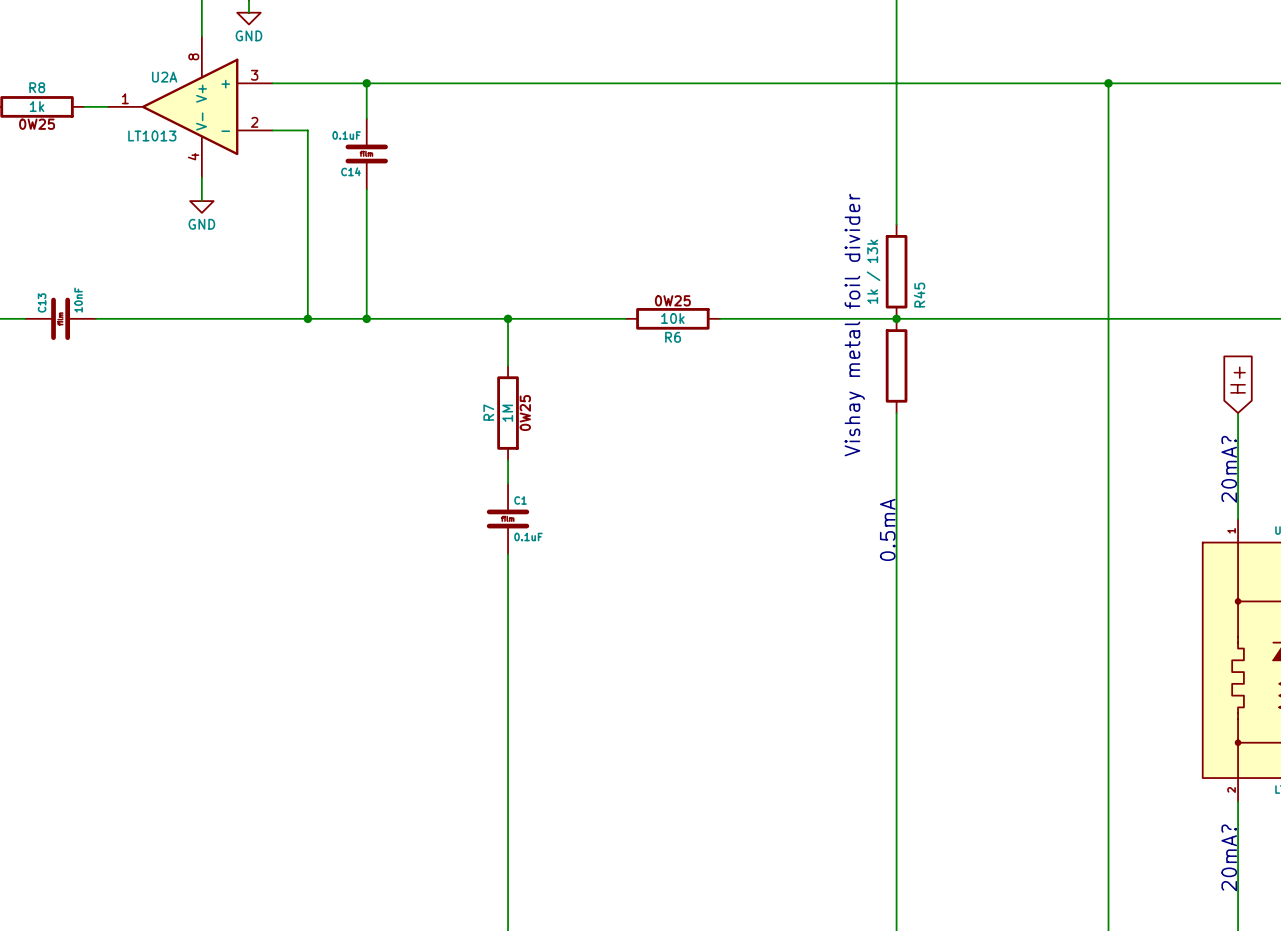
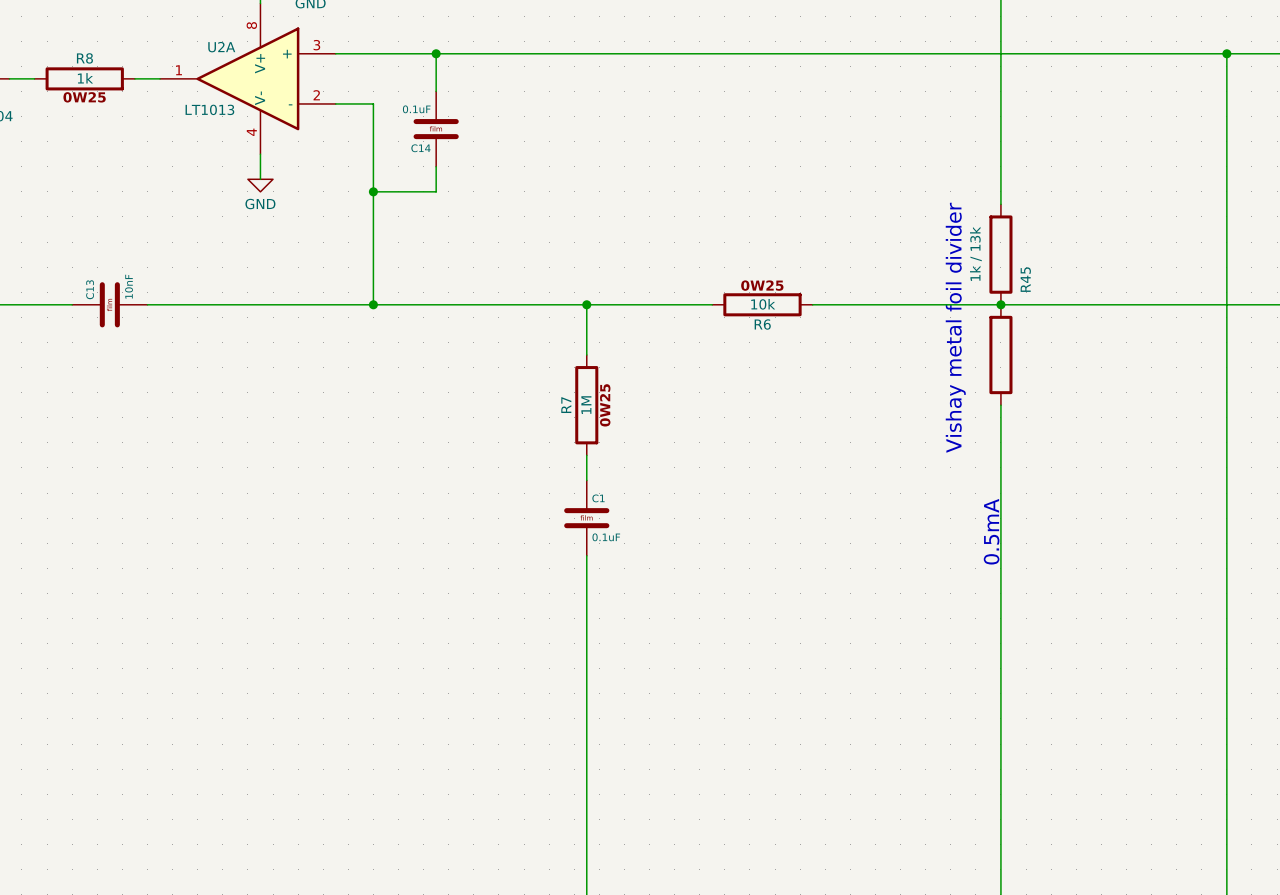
junction: none -> (373, 191)
wire: (366, 212) (366, 318) -> (436, 191) (373, 191)
junction: (366, 318) -> none

